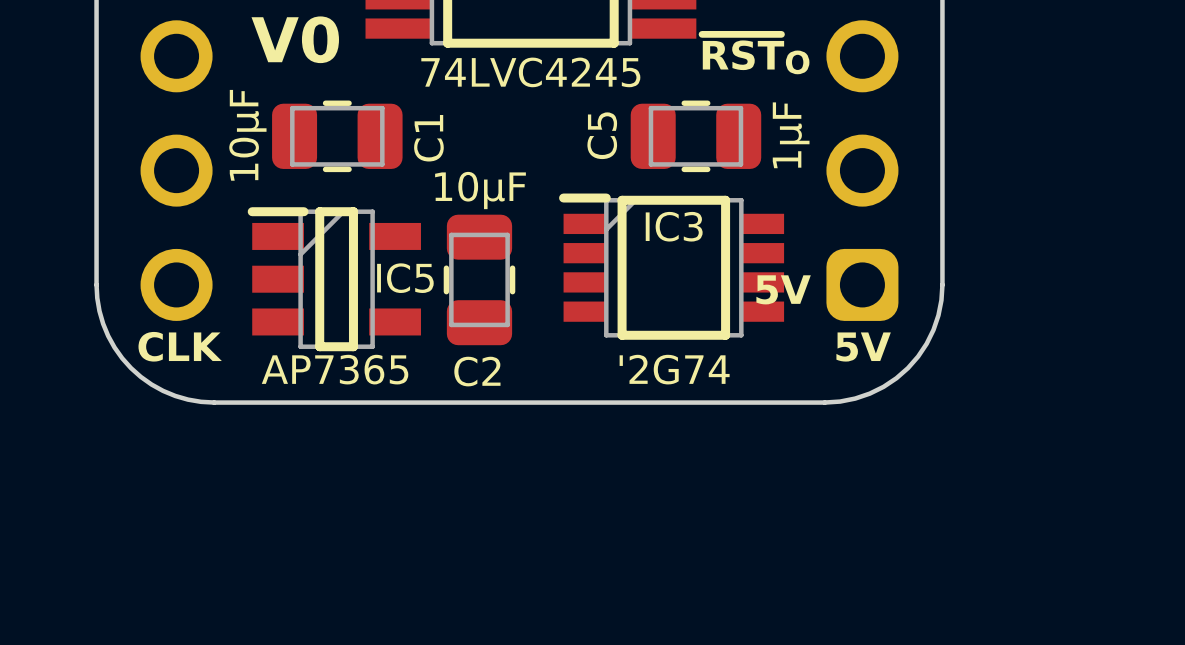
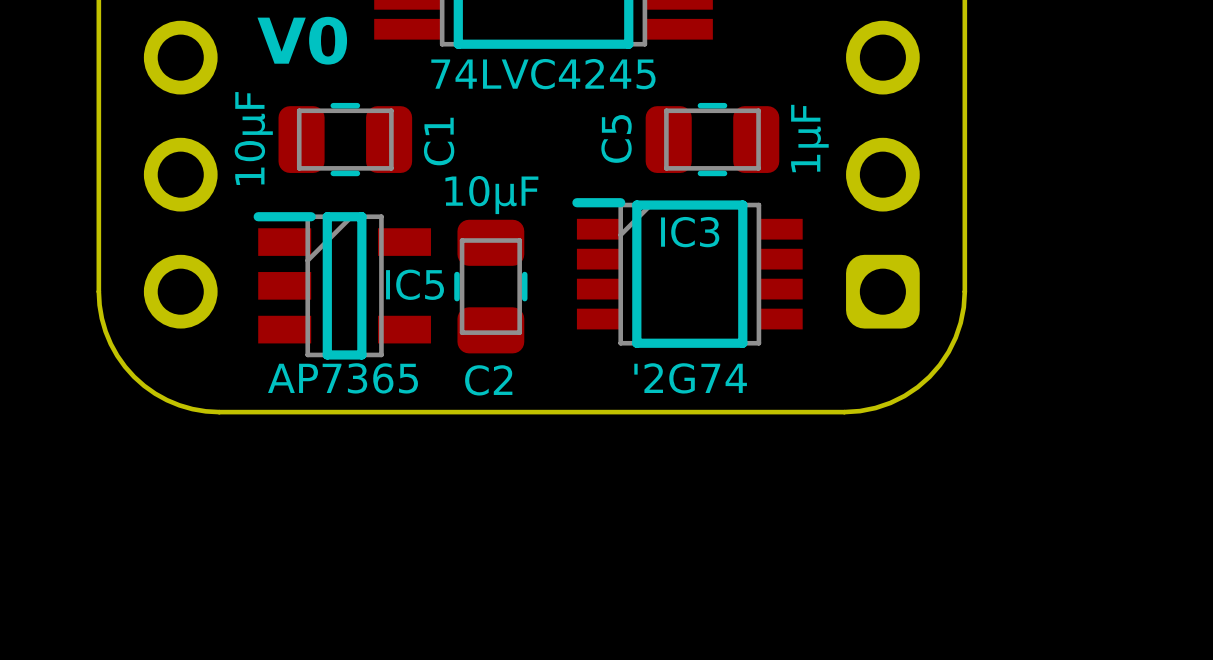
text: ~{RST}O (755, 54) -> none
text: 5V (783, 289) -> none
text: CLK (180, 346) -> none
text: 5V (863, 347) -> none

